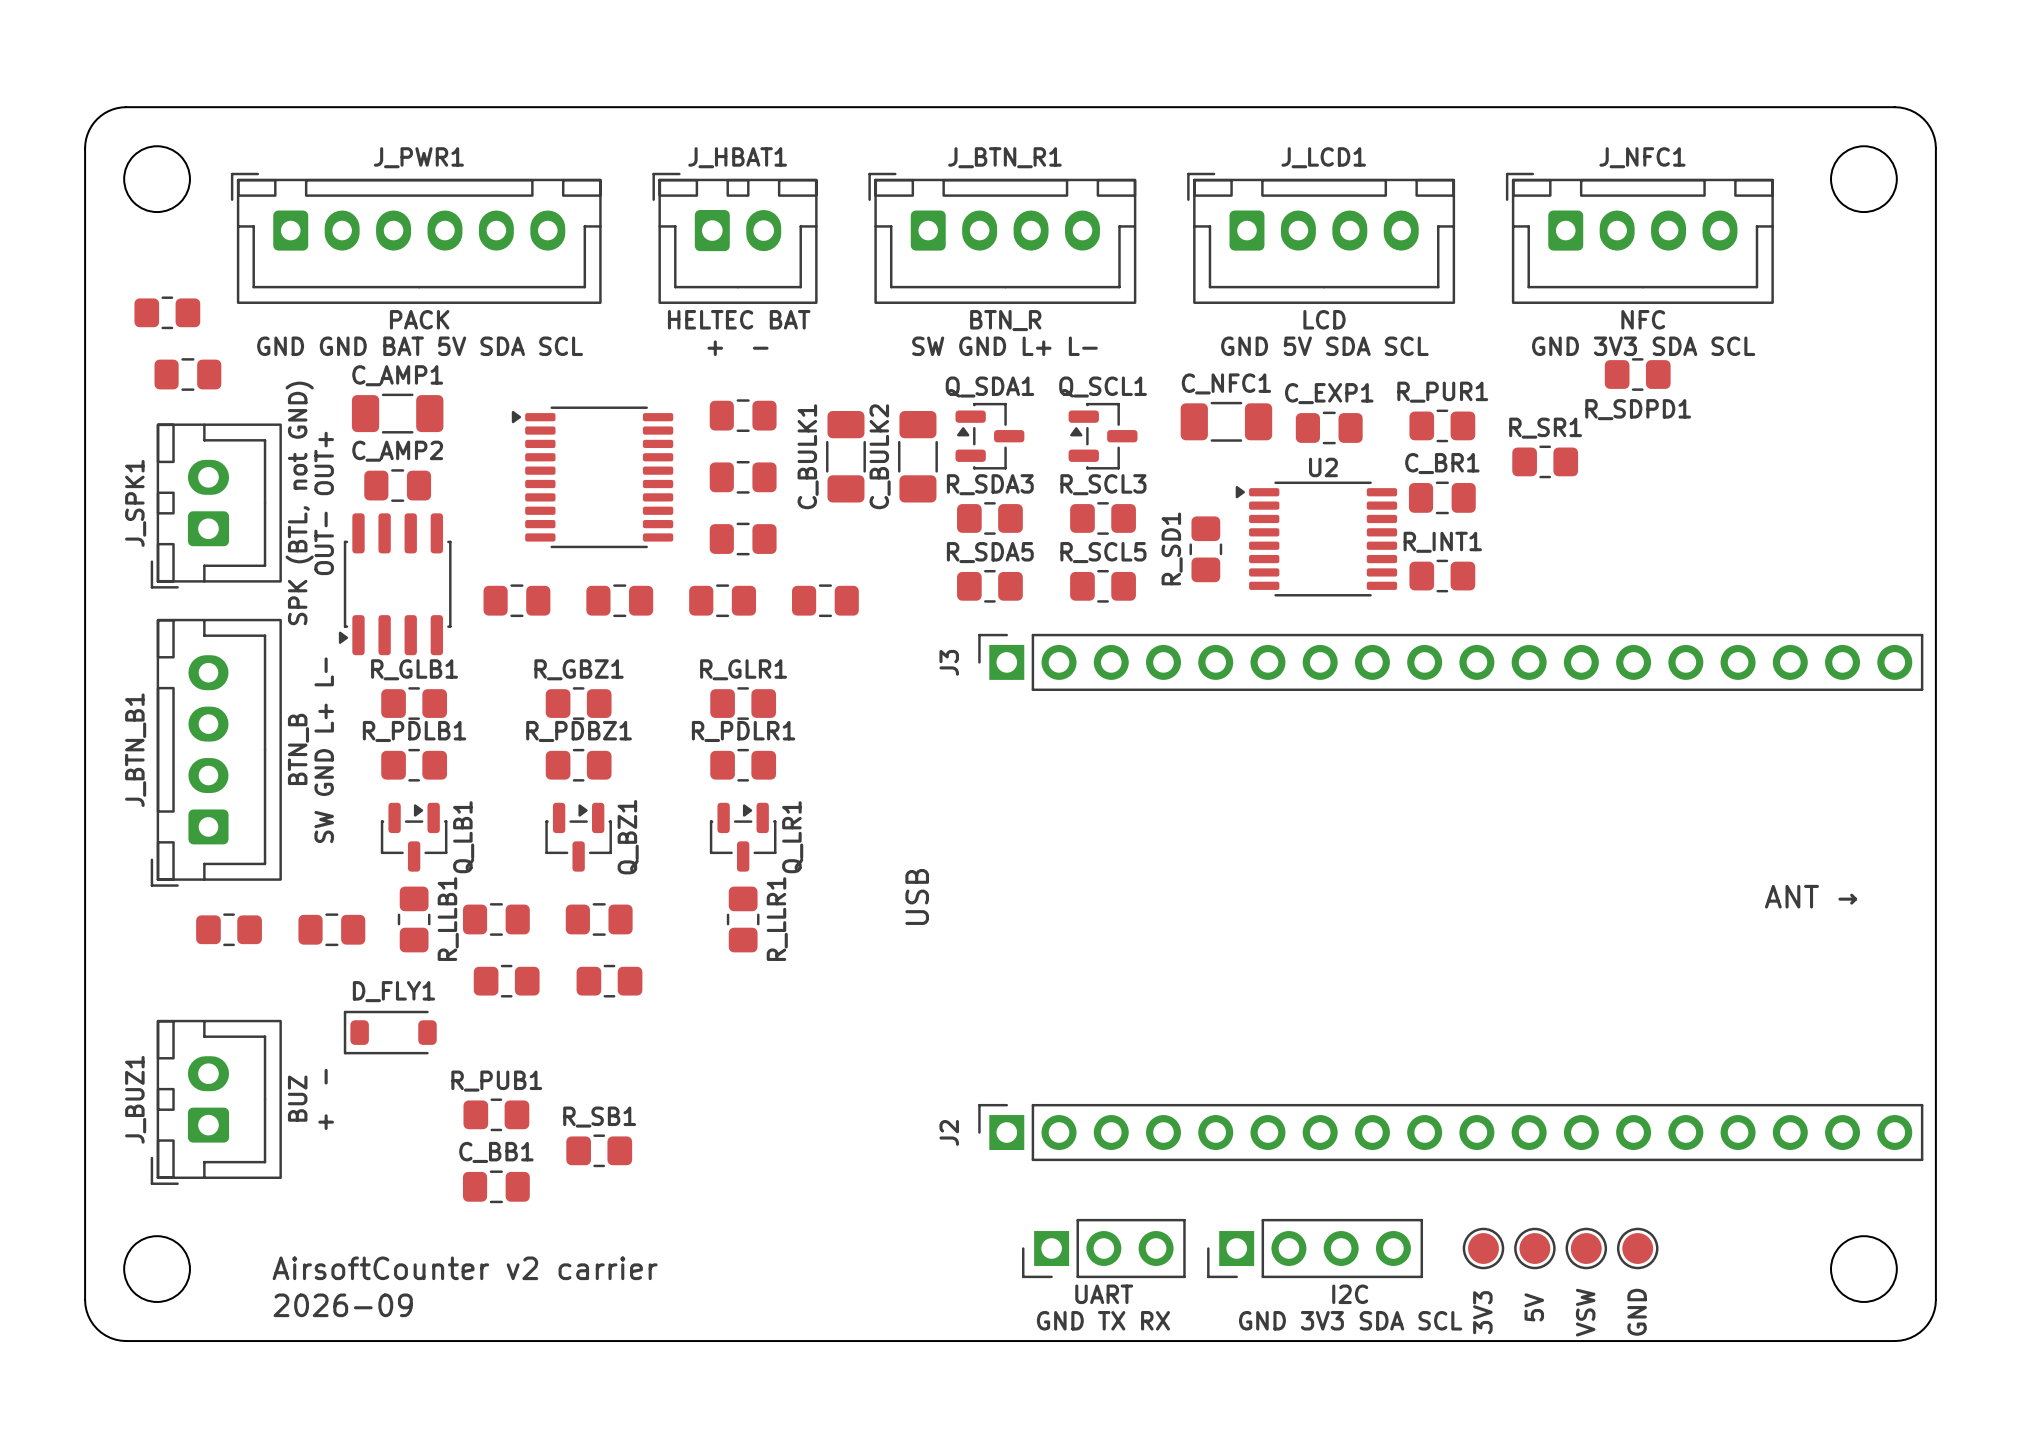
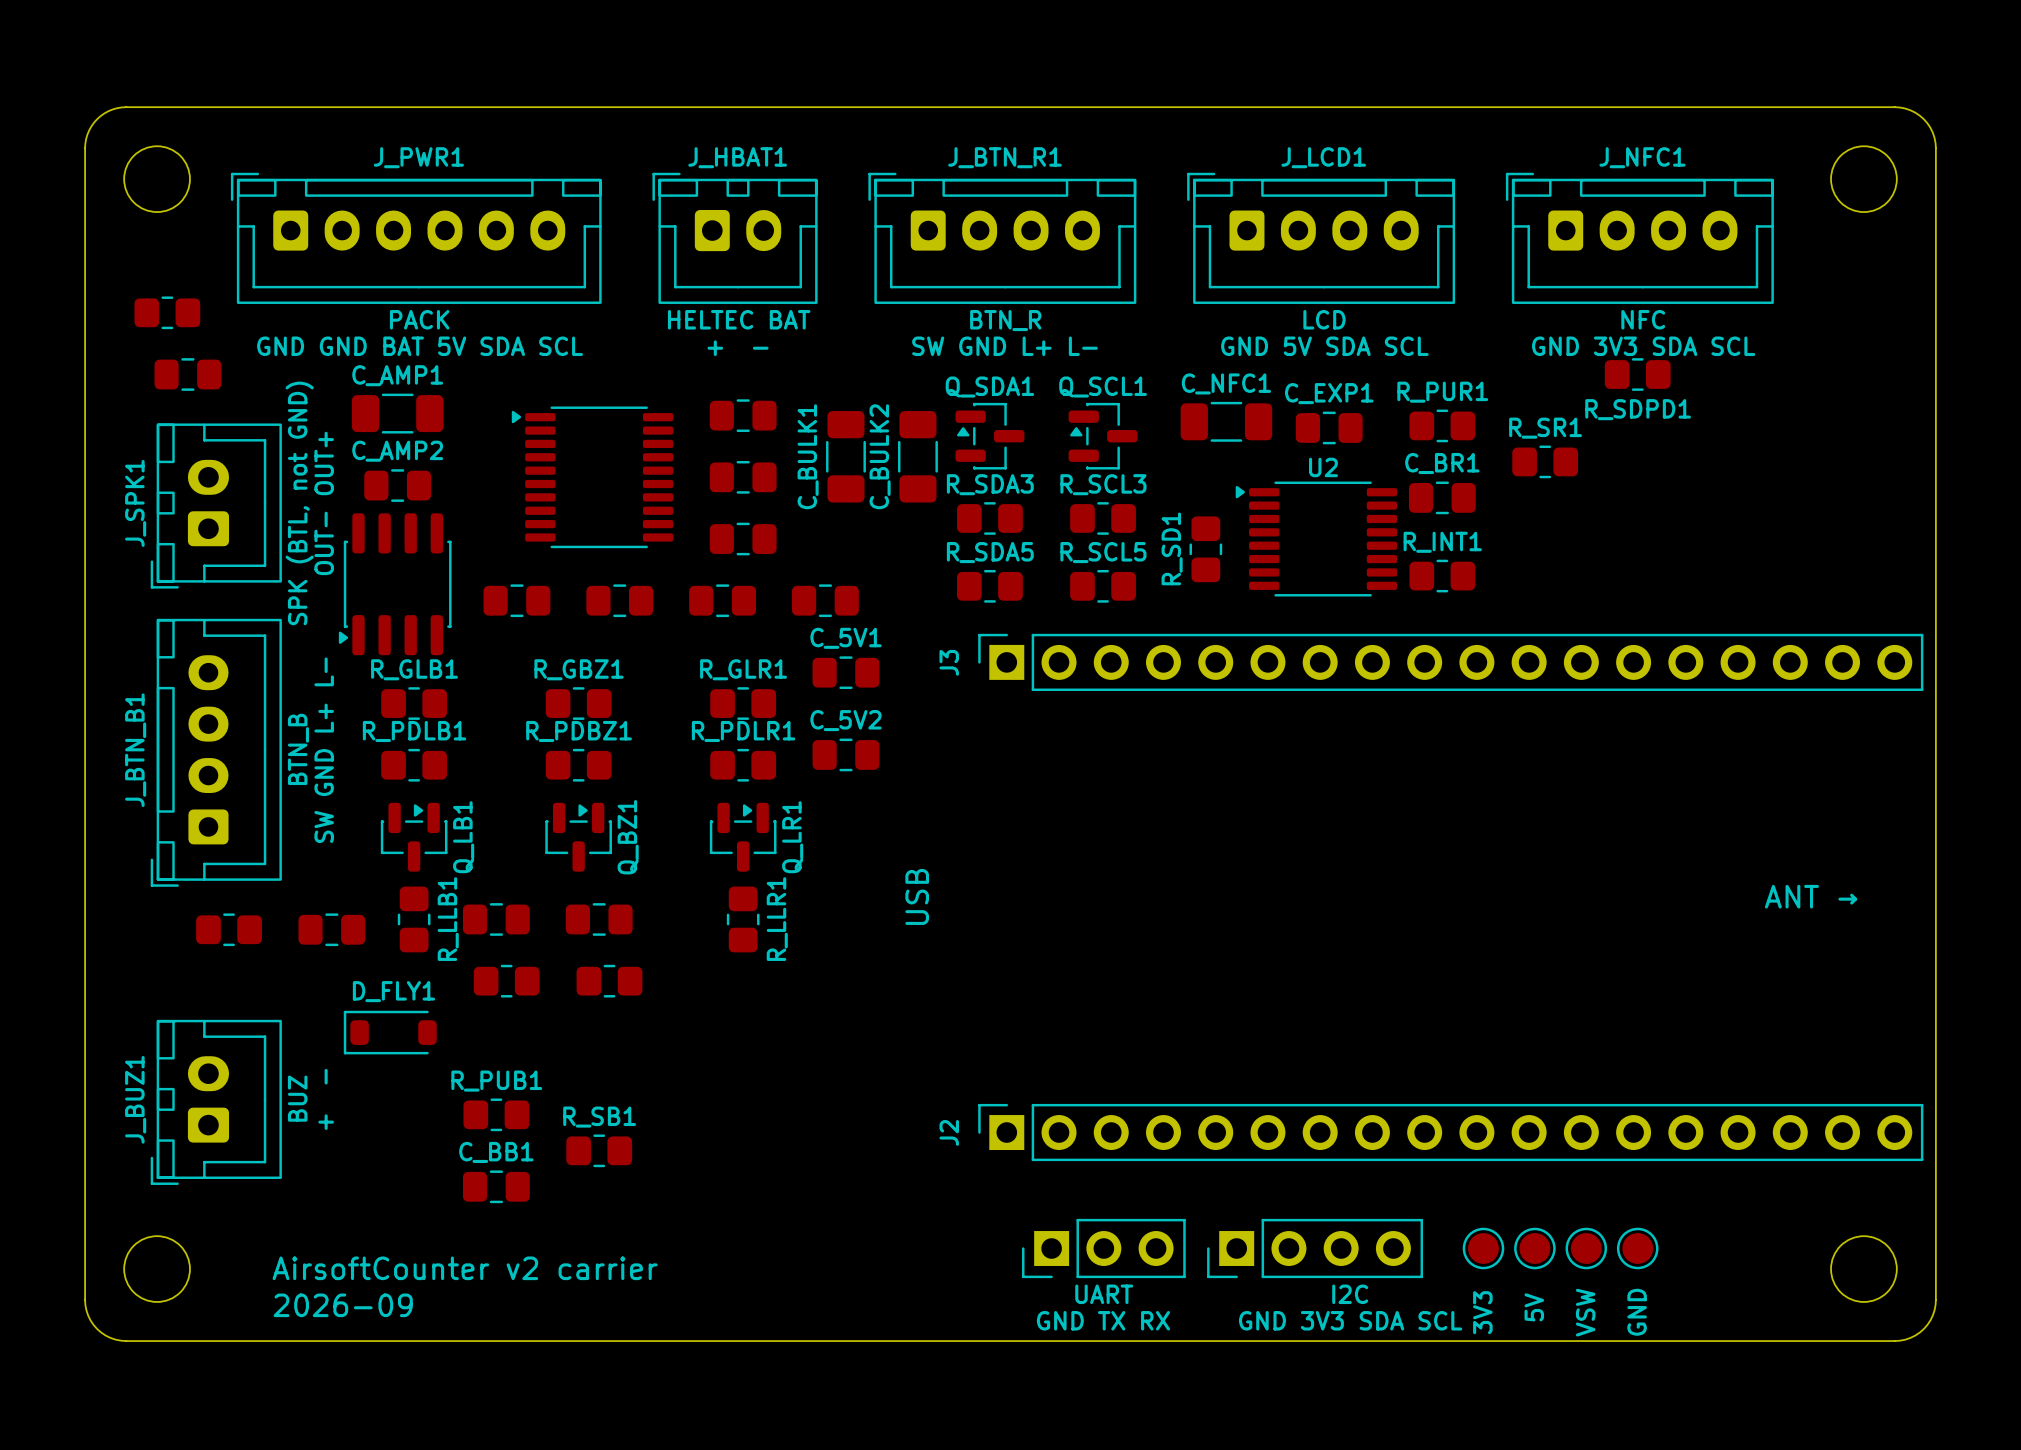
C_5V1: none -> (845, 672)
C_5V2: none -> (845, 754)

